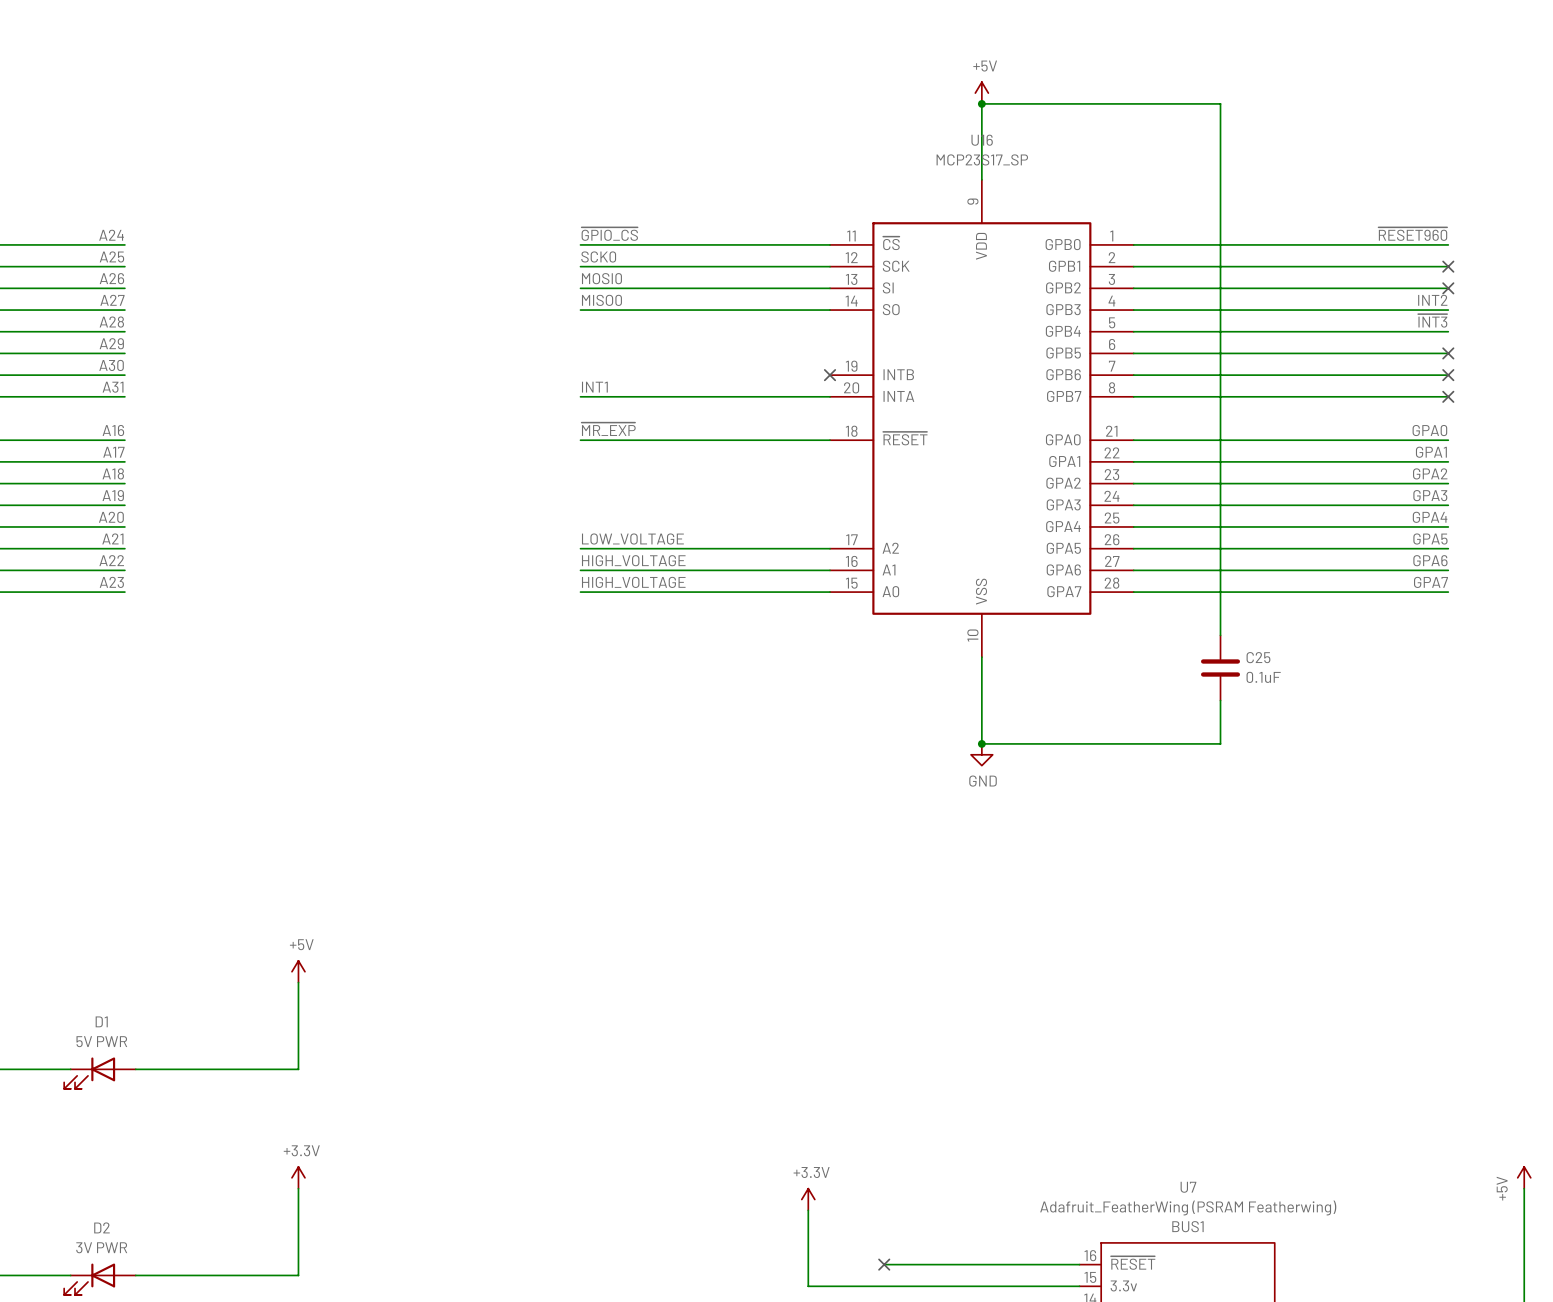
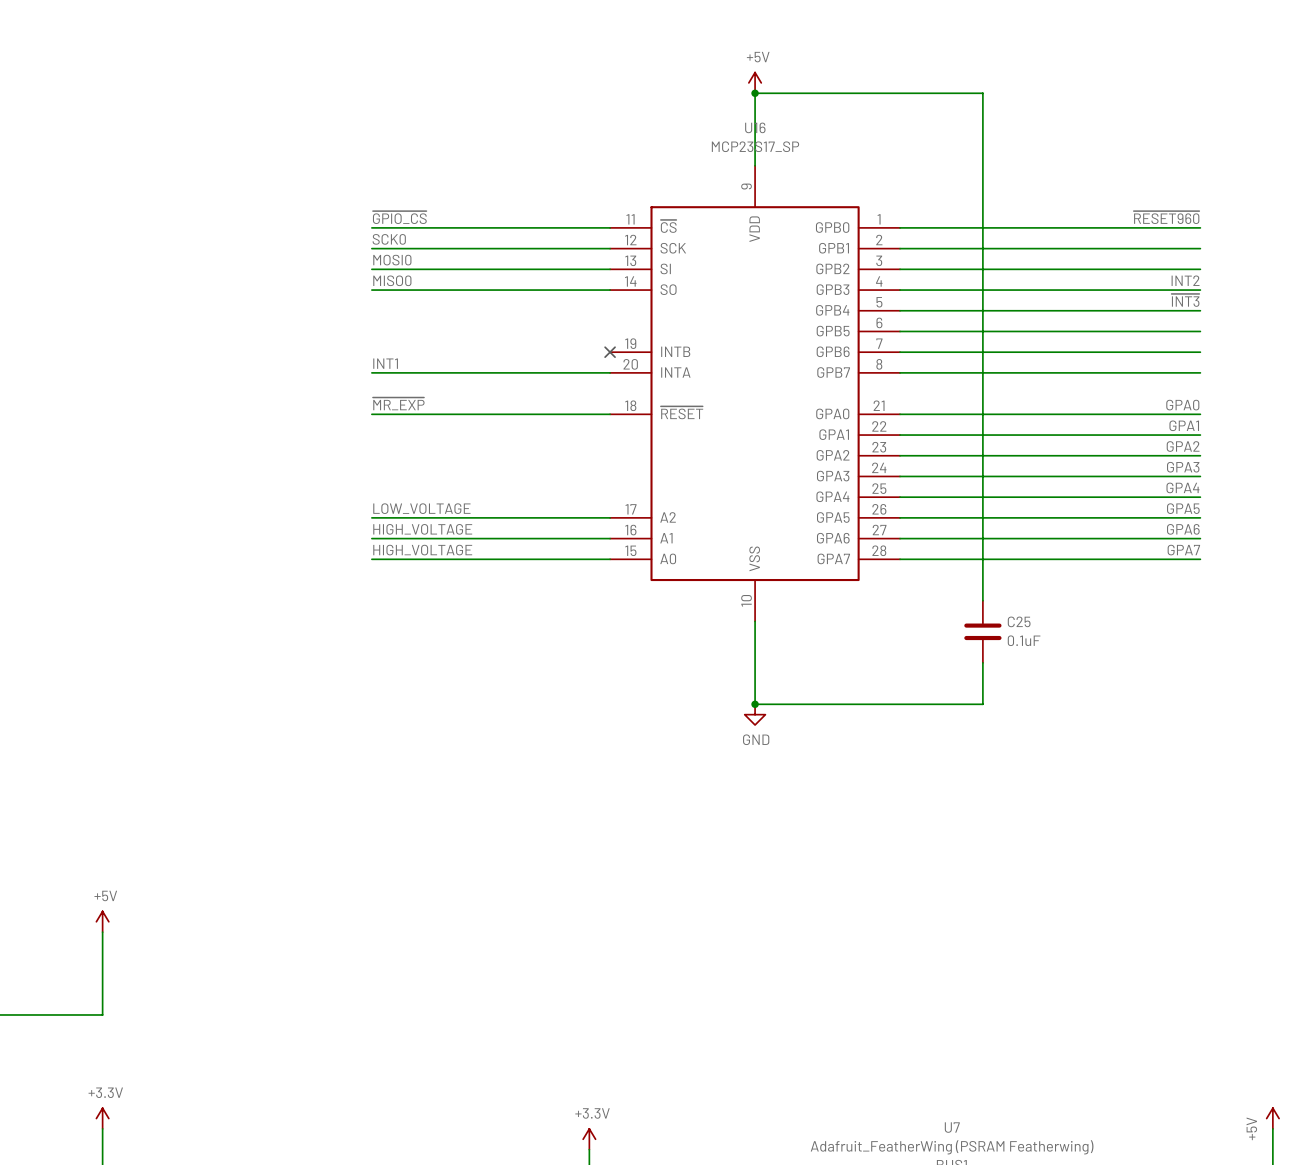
no-connect mark: (1448, 266) -> none
no-connect mark: (1448, 288) -> none
no-connect mark: (1448, 353) -> none
no-connect mark: (1448, 375) -> none
no-connect mark: (1448, 396) -> none

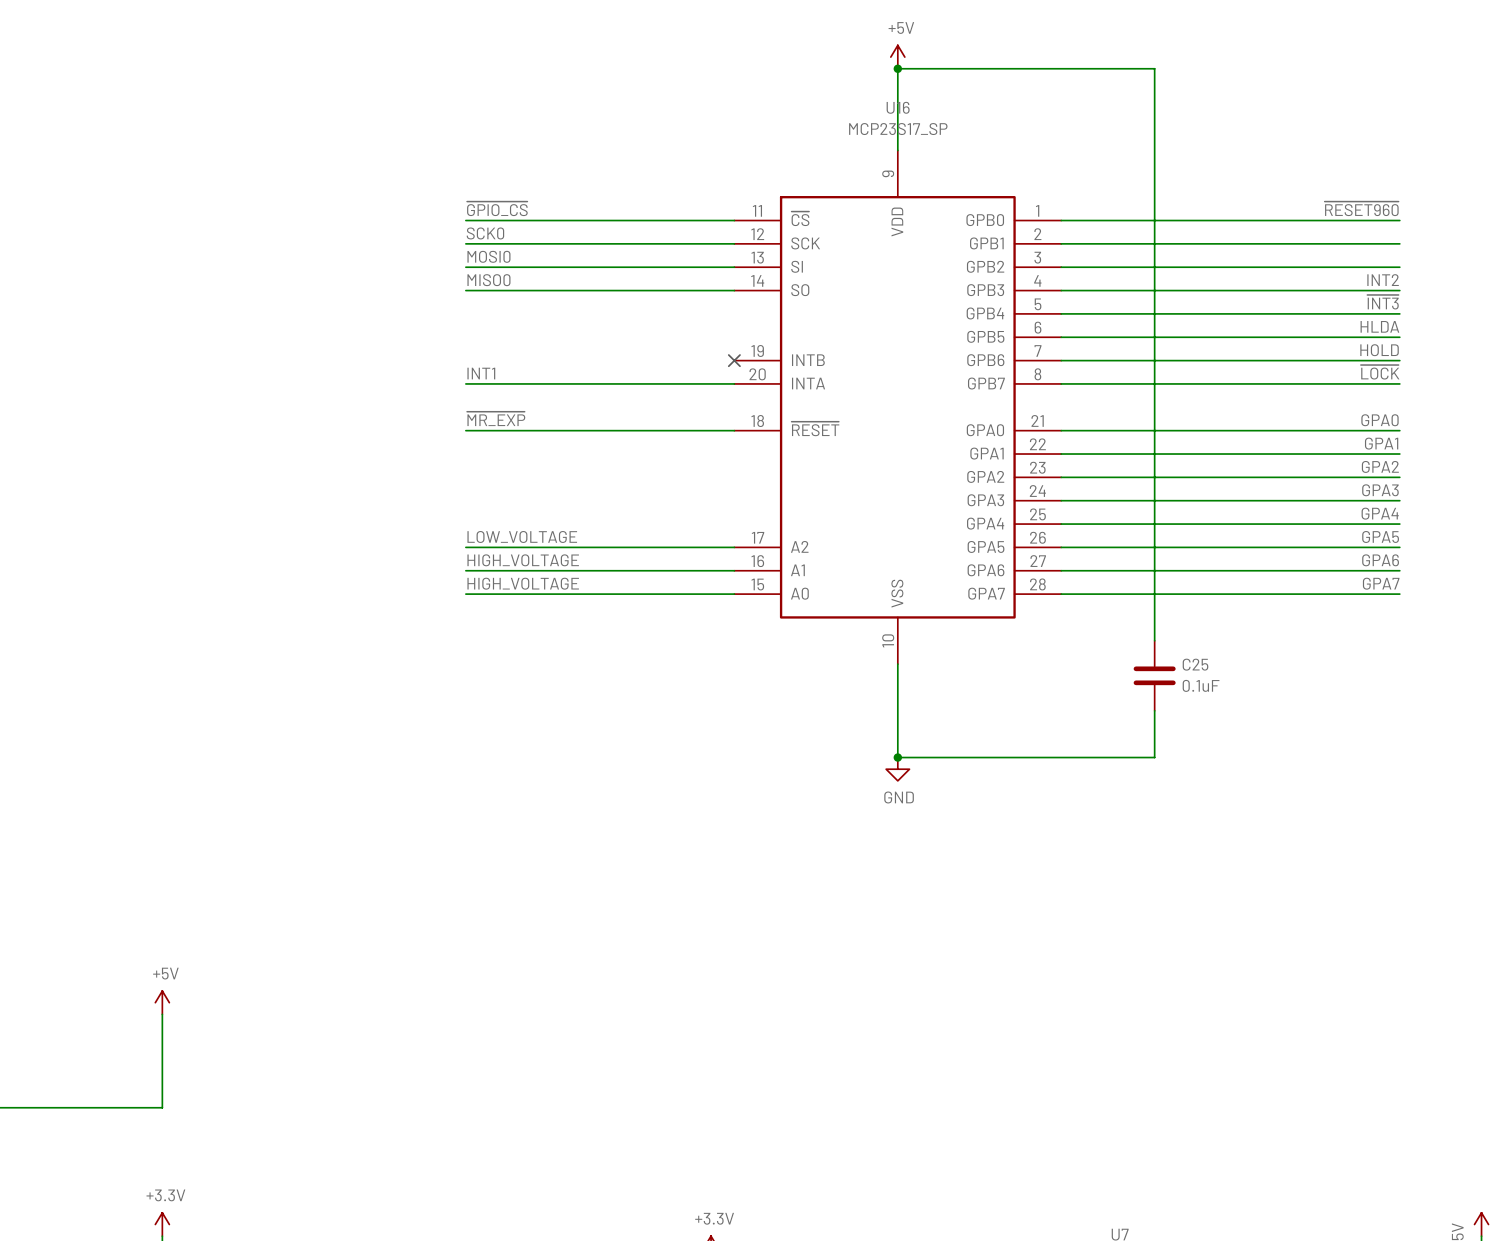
label: none -> HLDA (1379, 326)
label: none -> HOLD (1379, 350)
label: none -> ~{LOCK} (1380, 372)

